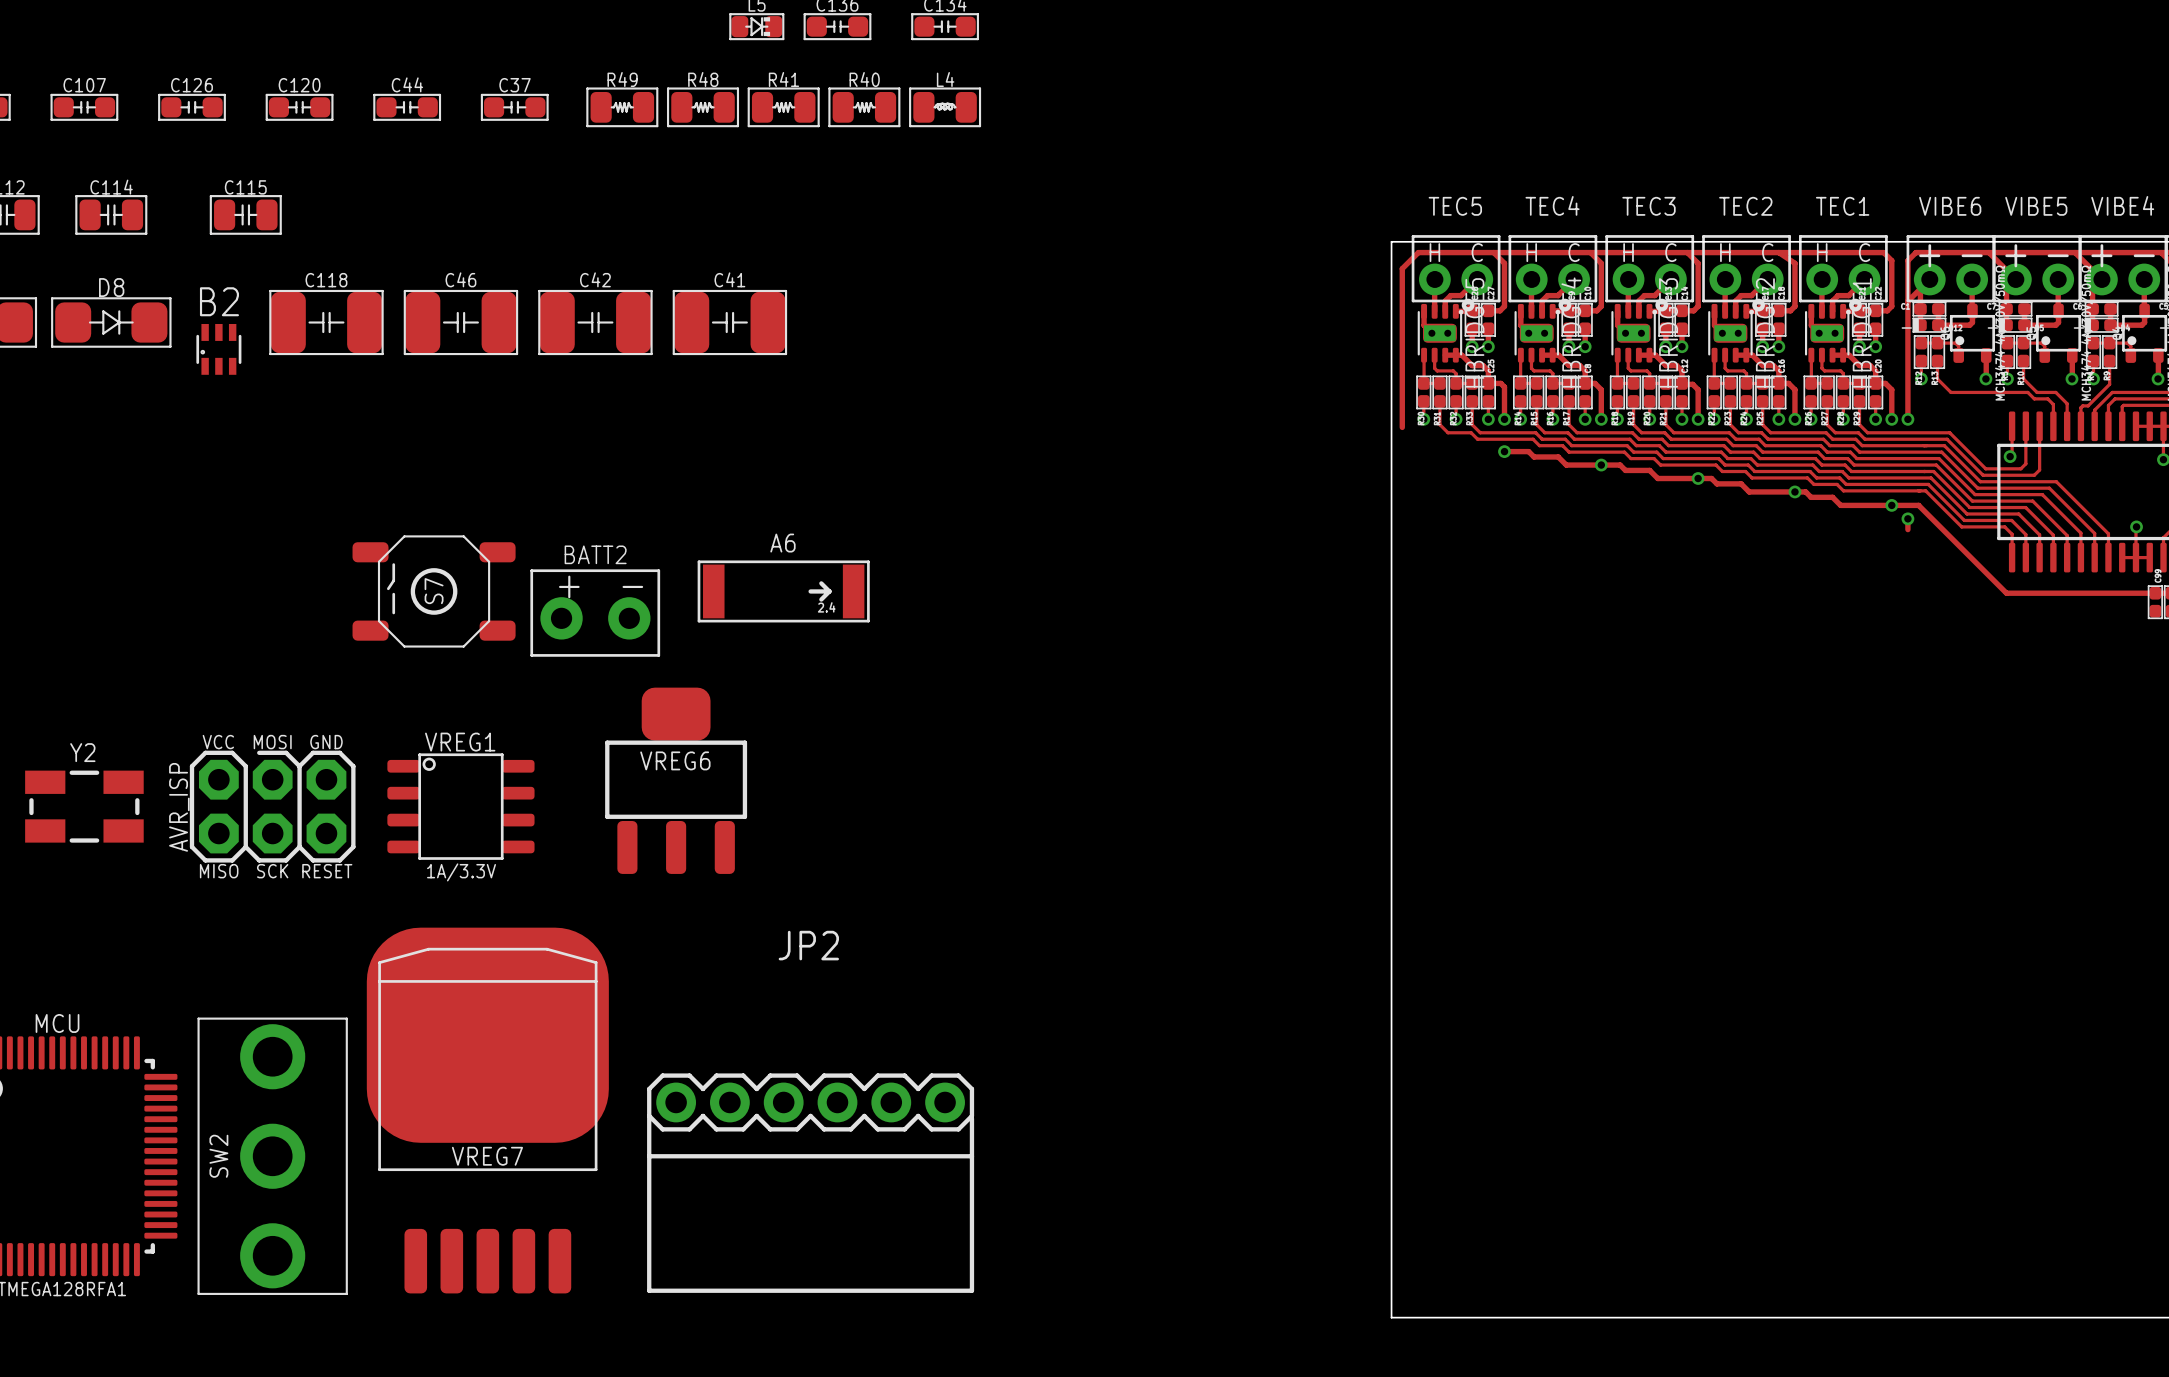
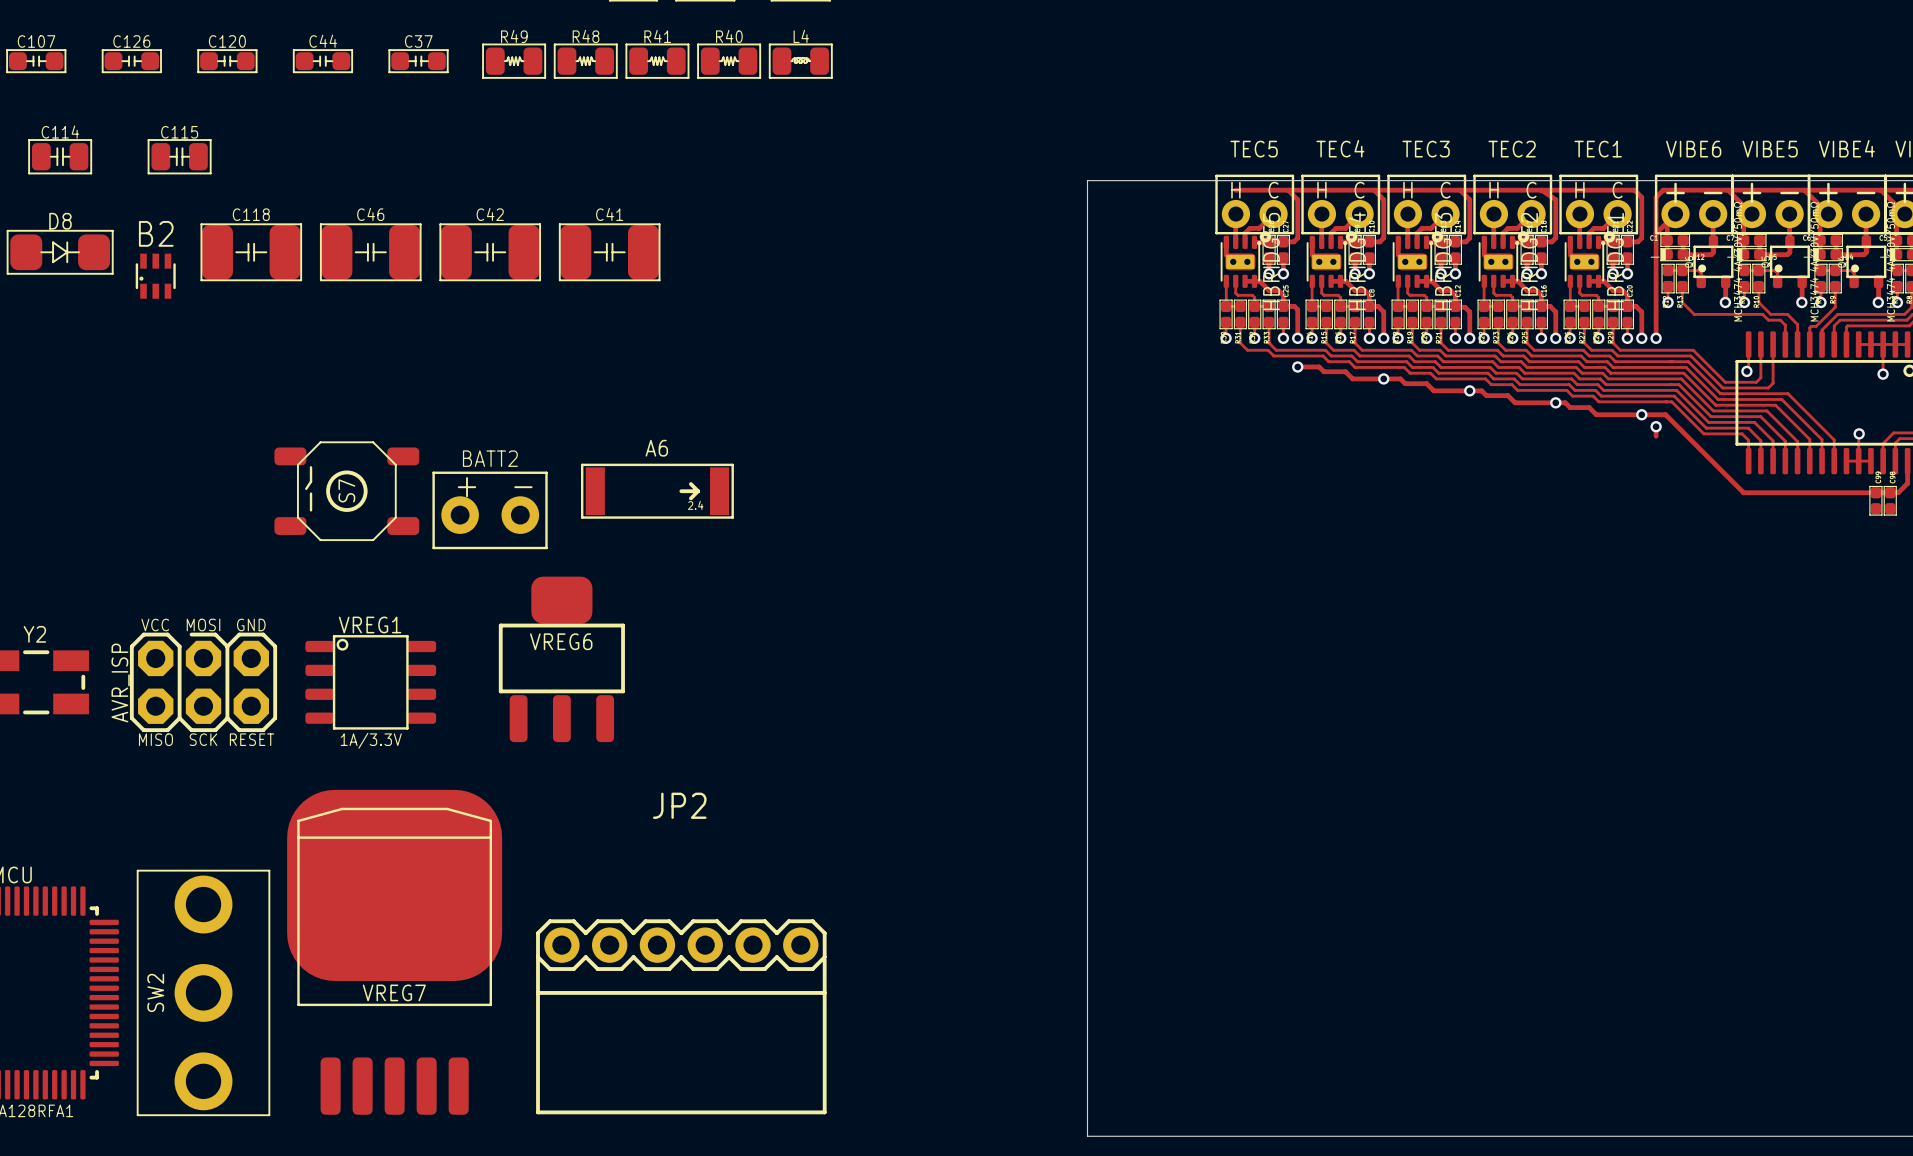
board edge: (1391, 241) (1391, 1317) -> (1197, 180) (1087, 180) (1087, 1136) (1197, 1136)
track: (1434, 252) (1418, 252) (1402, 268) (1402, 427) -> none

